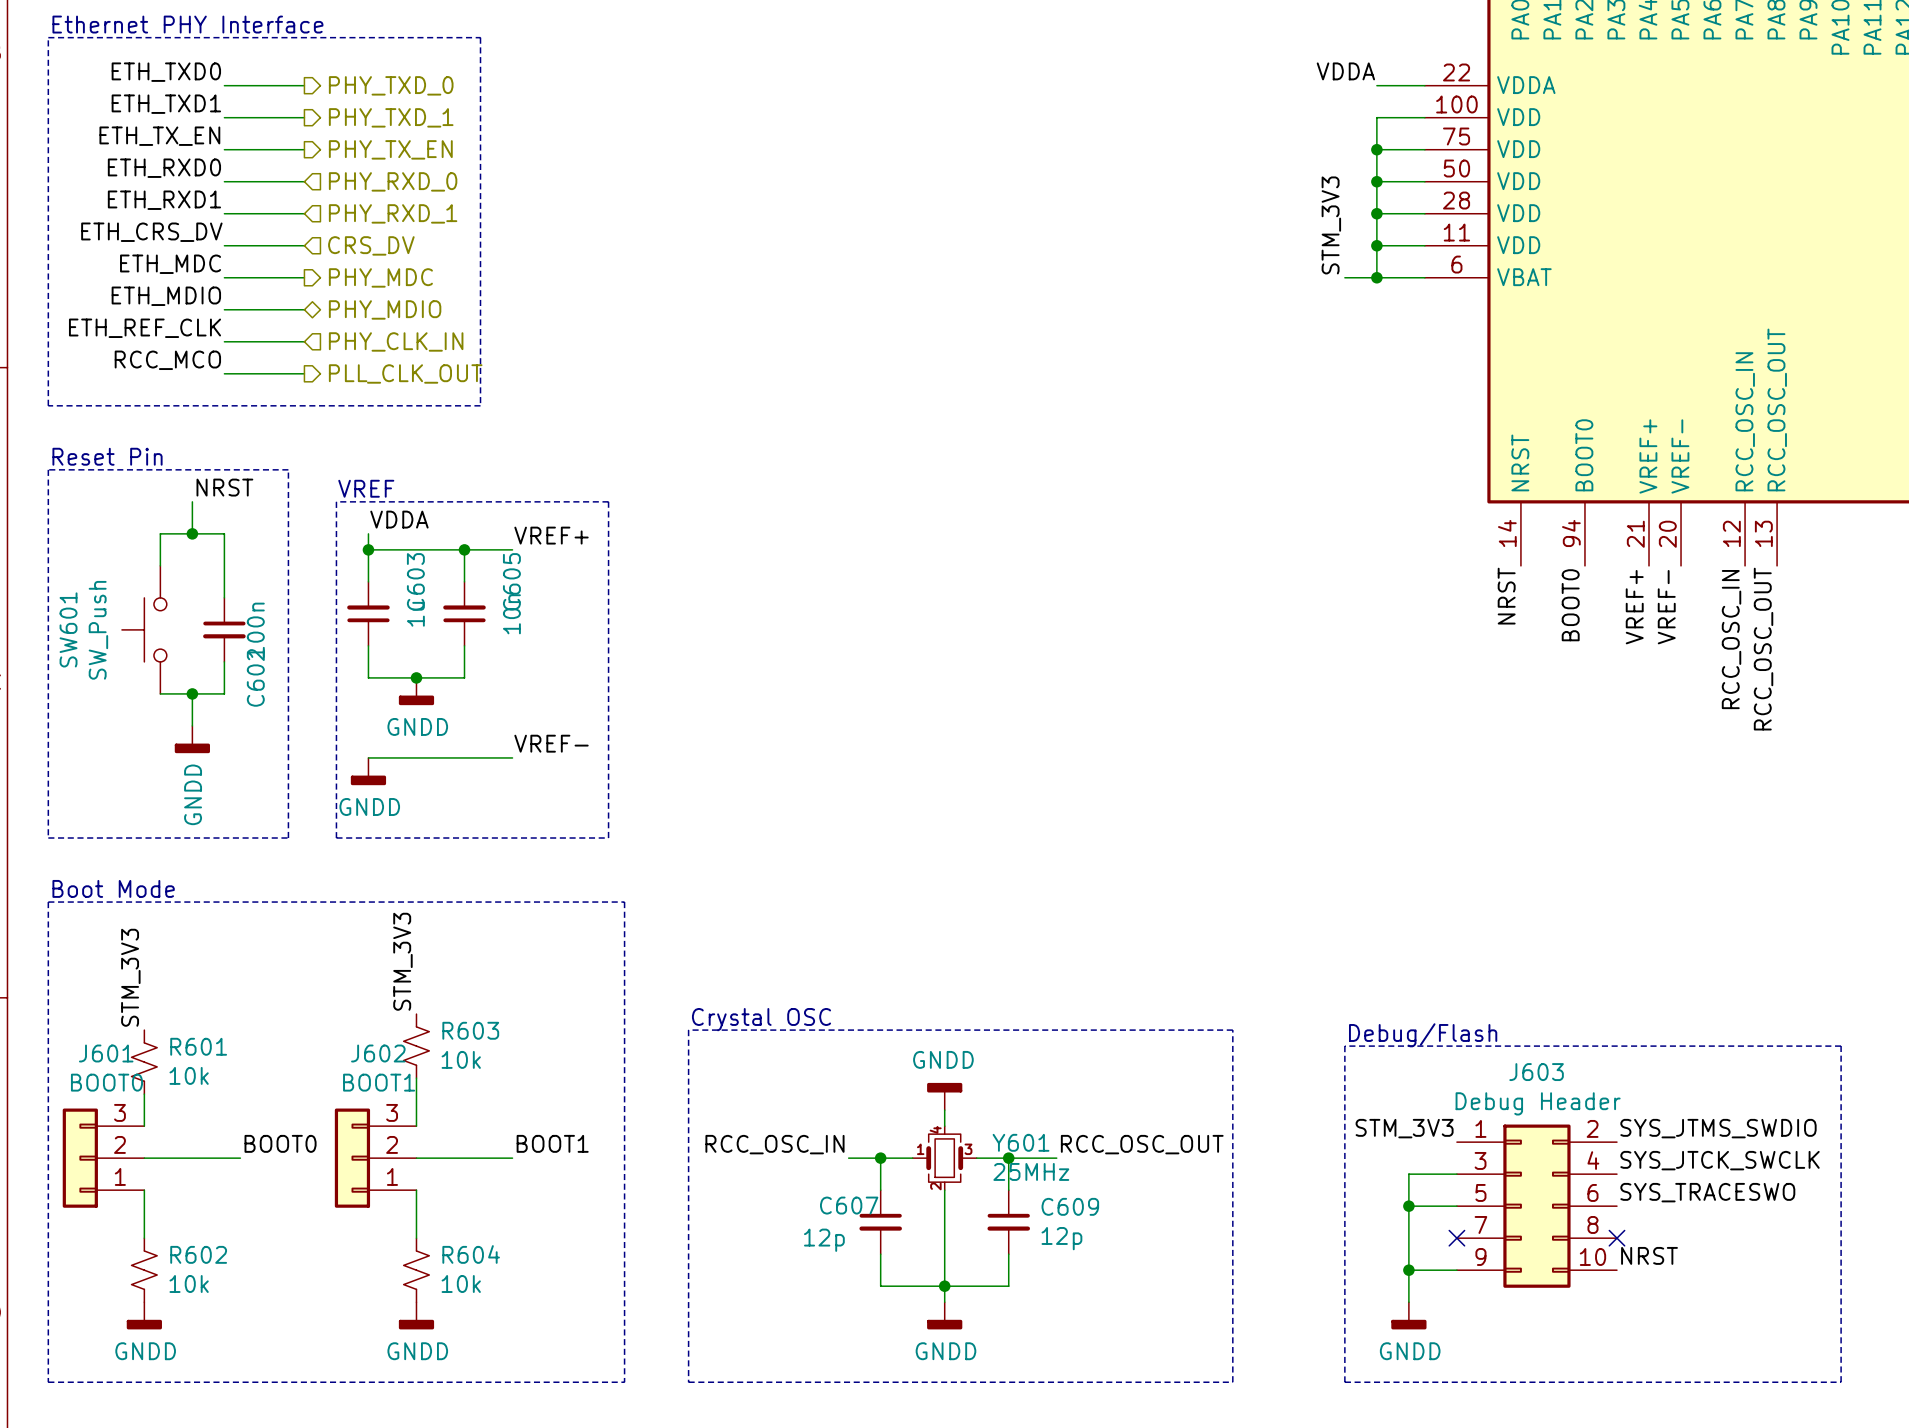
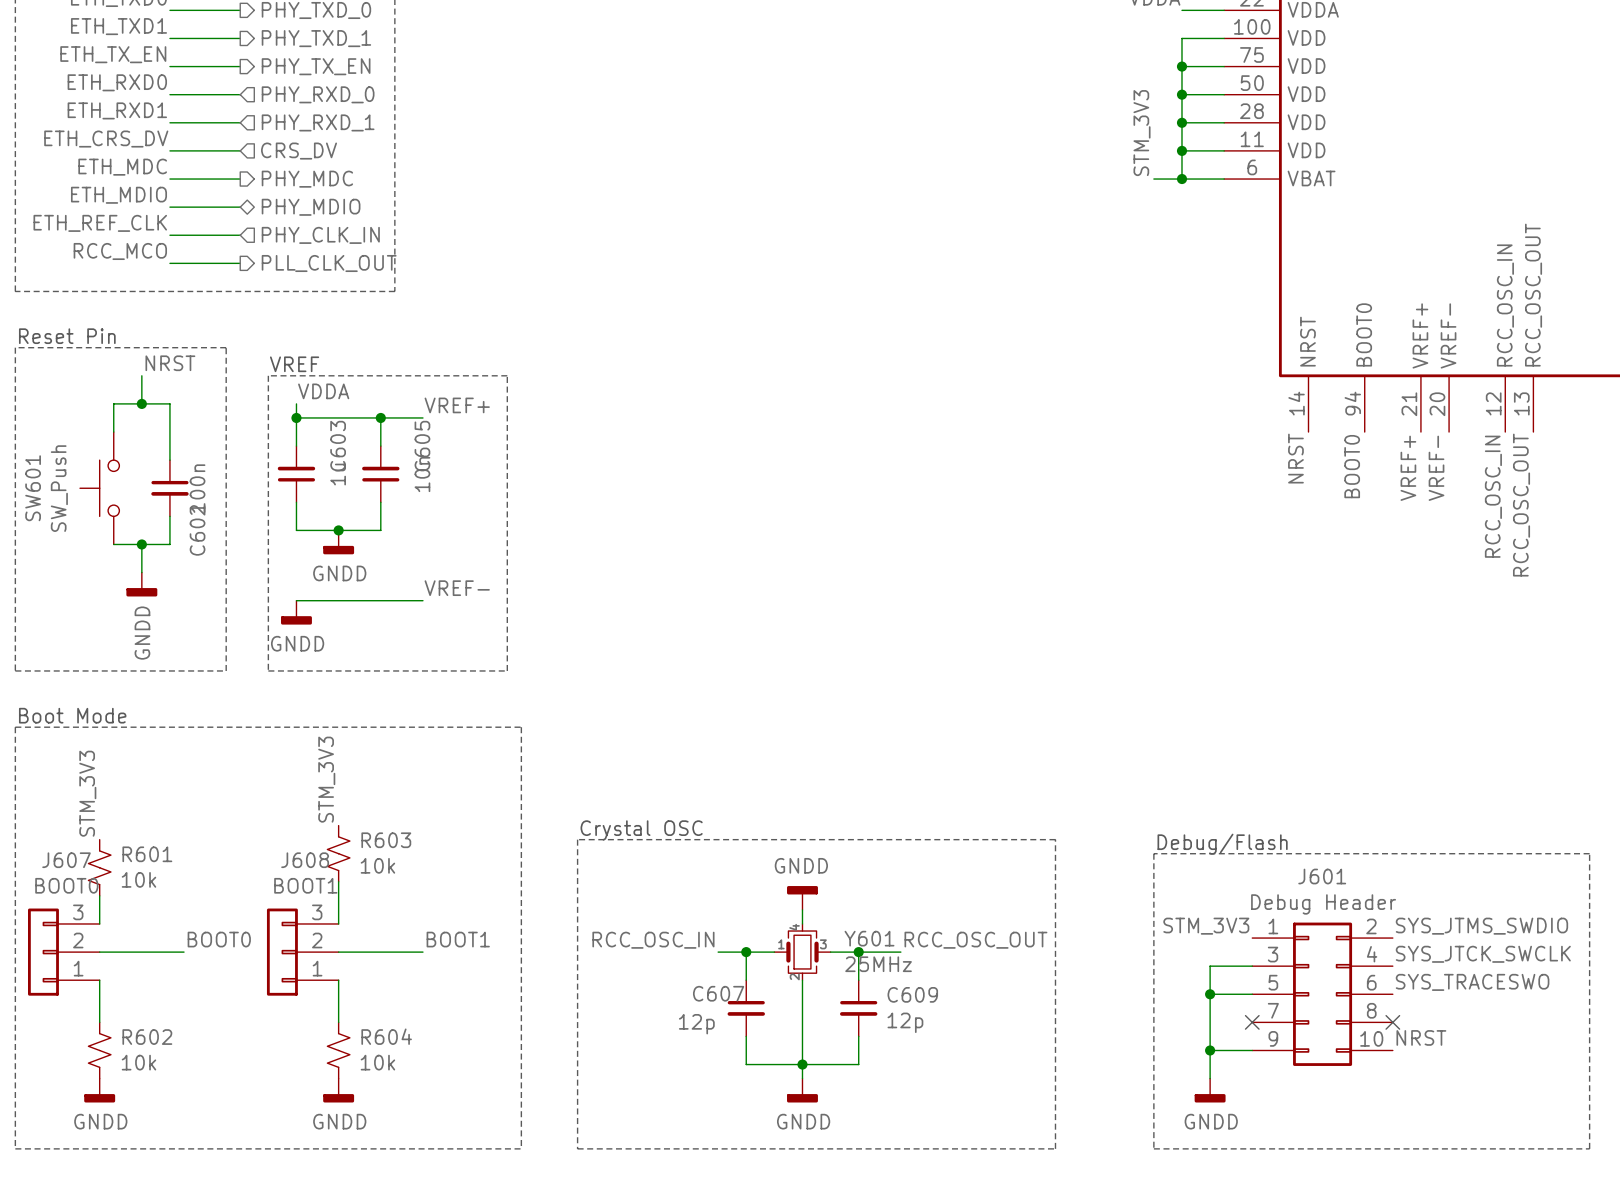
J601 name: J601 (106, 1053) -> J607 (66, 860)
J602 name: J602 (378, 1053) -> J608 (305, 860)
J603 name: J603 (1536, 1072) -> J601 (1322, 876)

